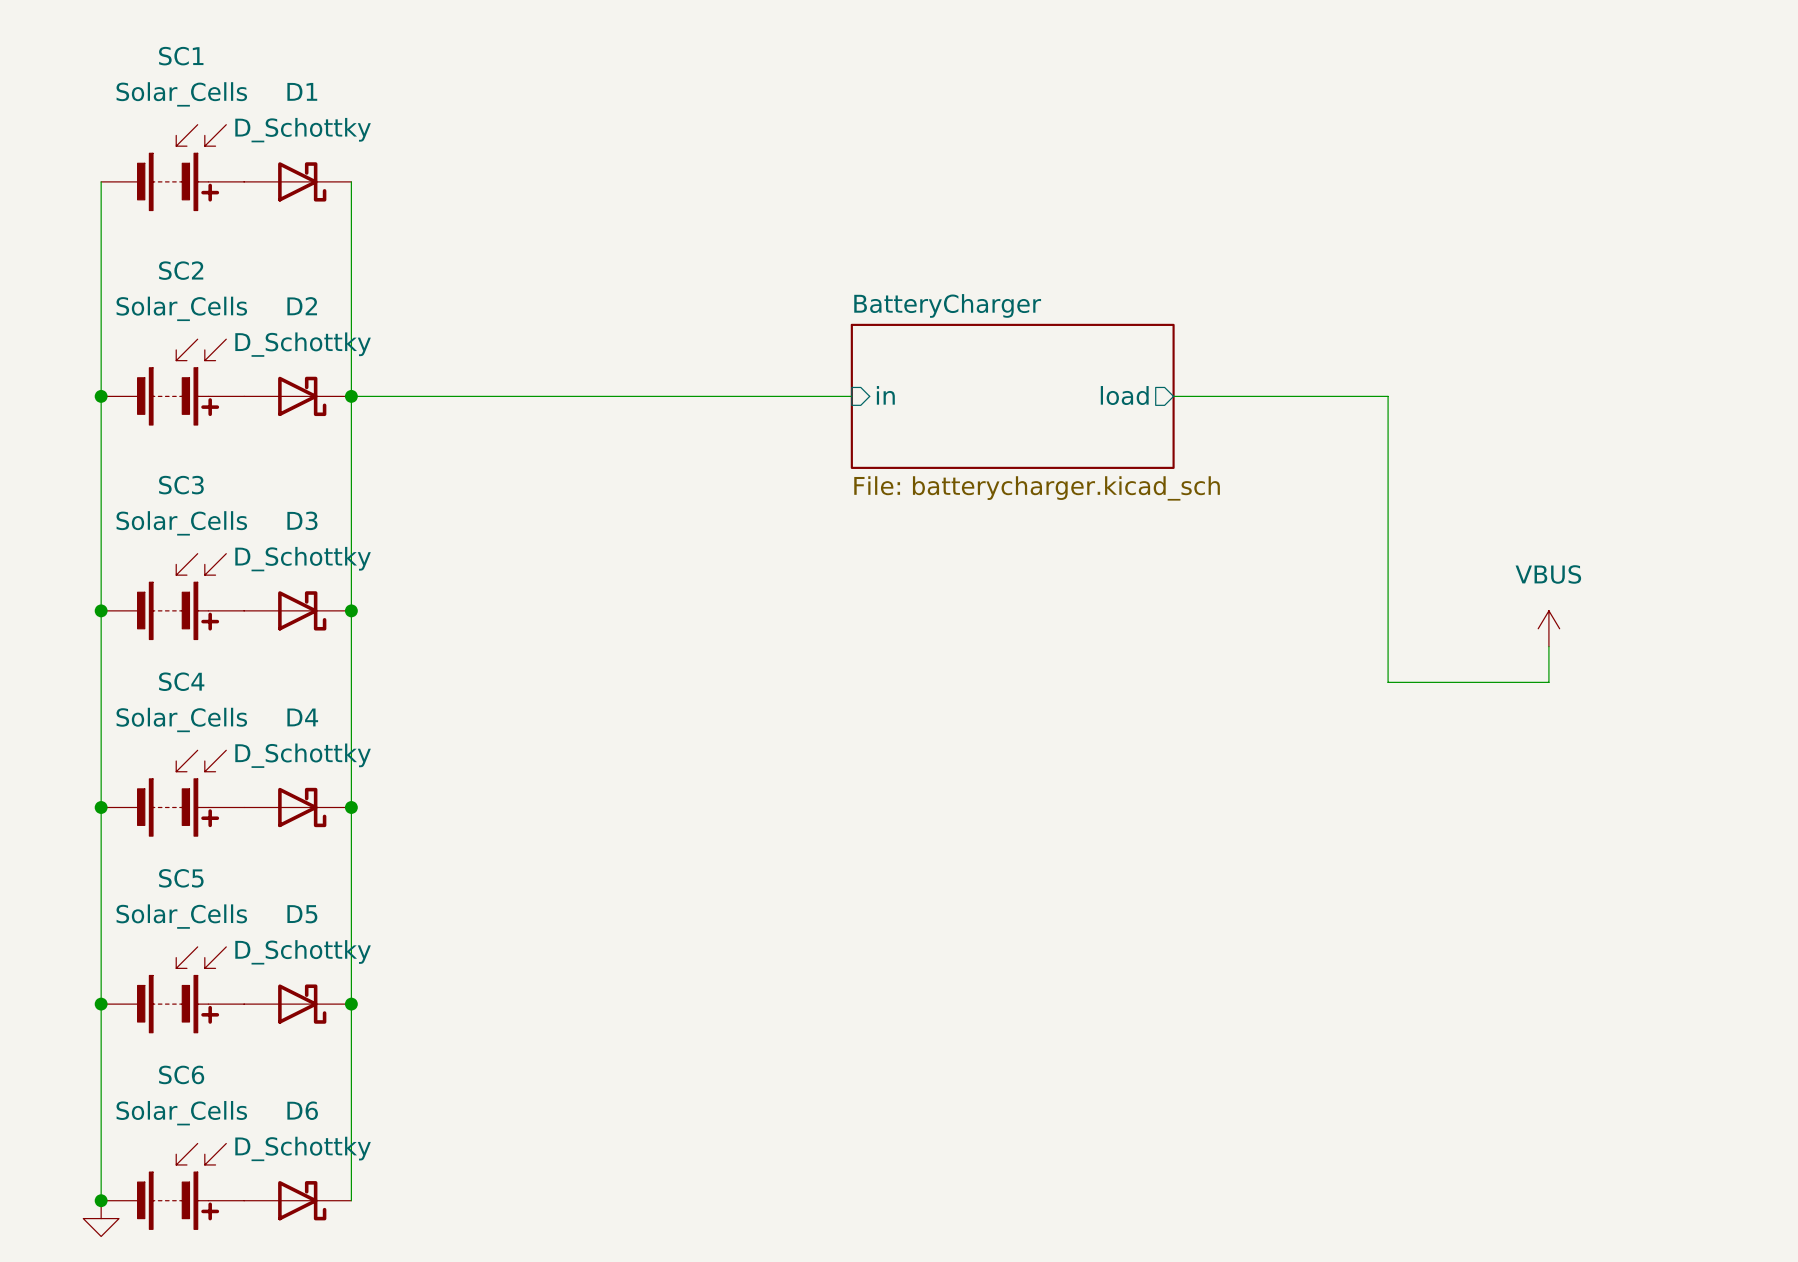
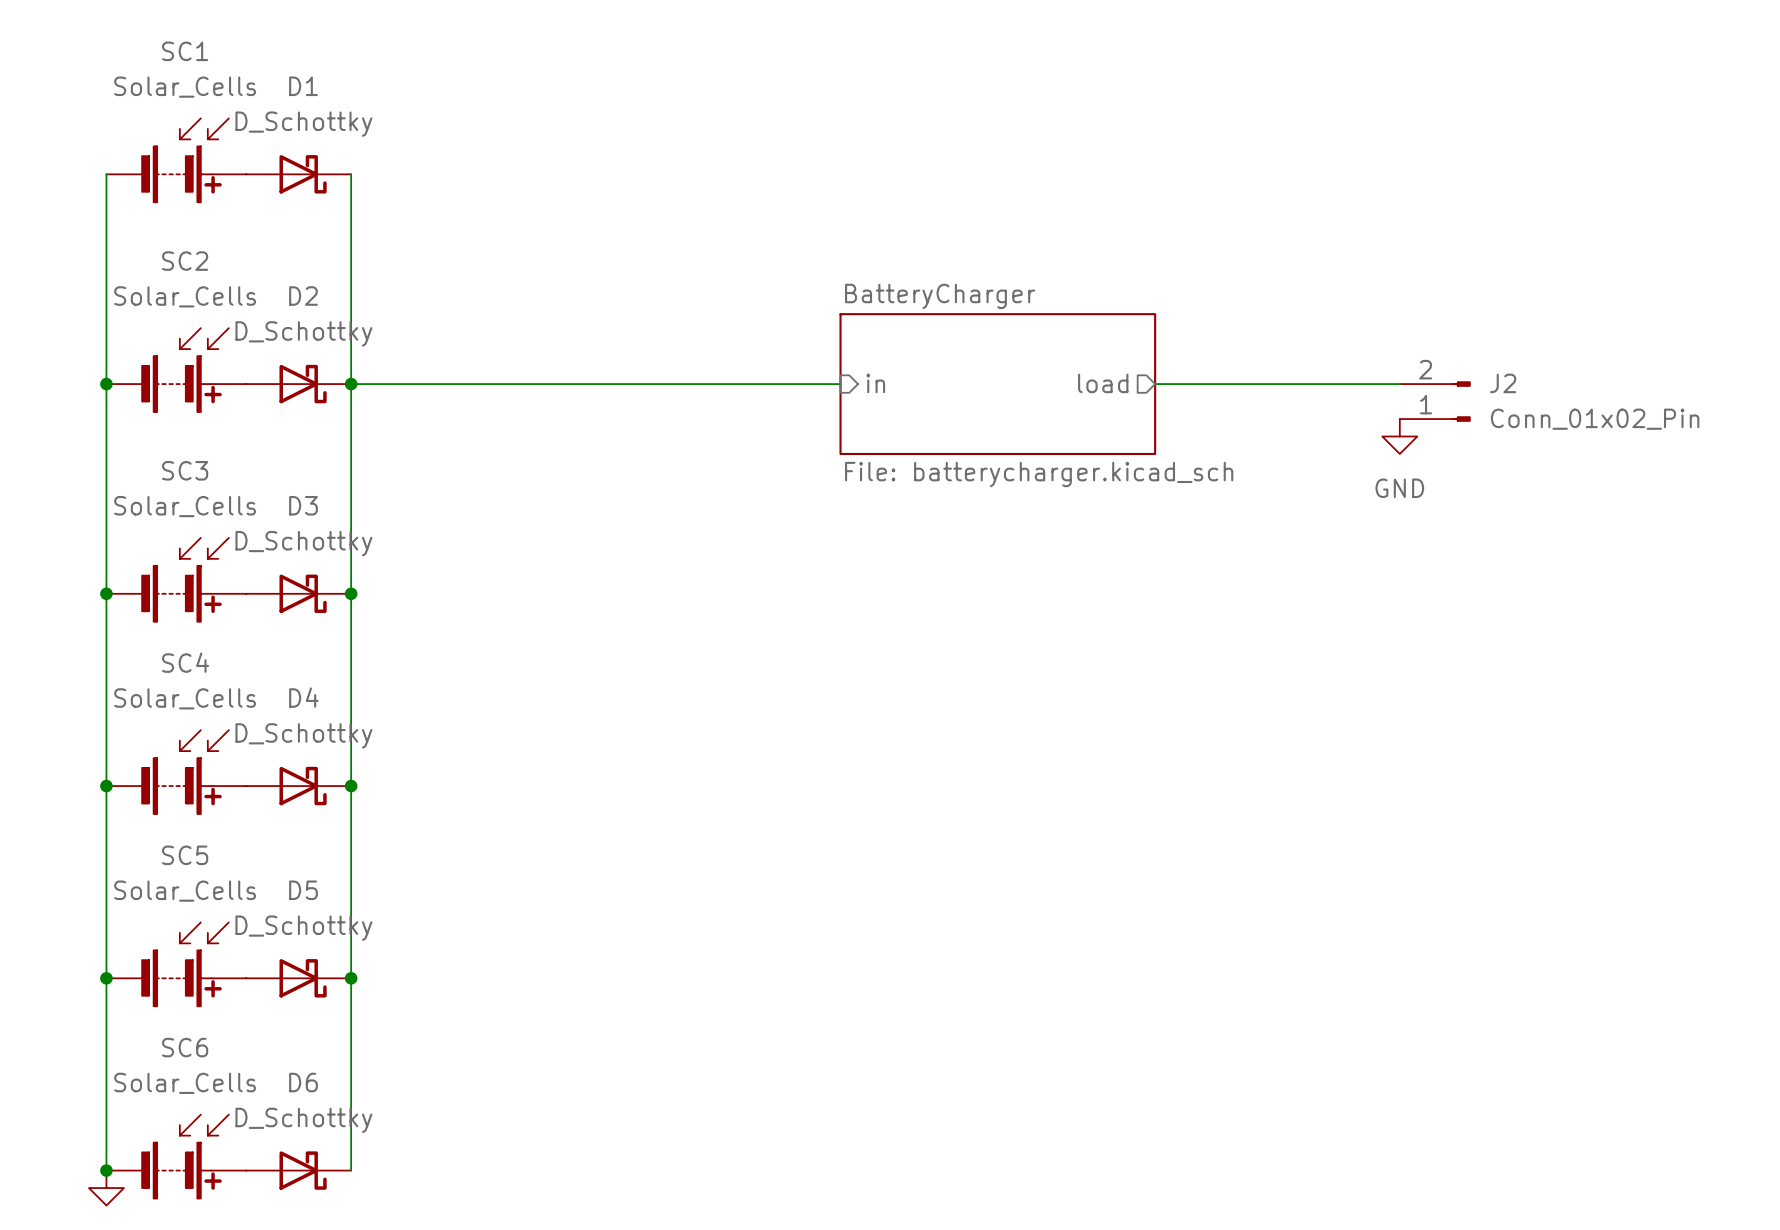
wire: (1388, 396) (1388, 682) (1548, 682) (1548, 646) -> (1364, 384) (1399, 384)
J2: none -> Conn_01x02_Pin (1435, 401)
power symbol: none -> GND (1399, 436)
power symbol: VBUS (1548, 628) -> none

